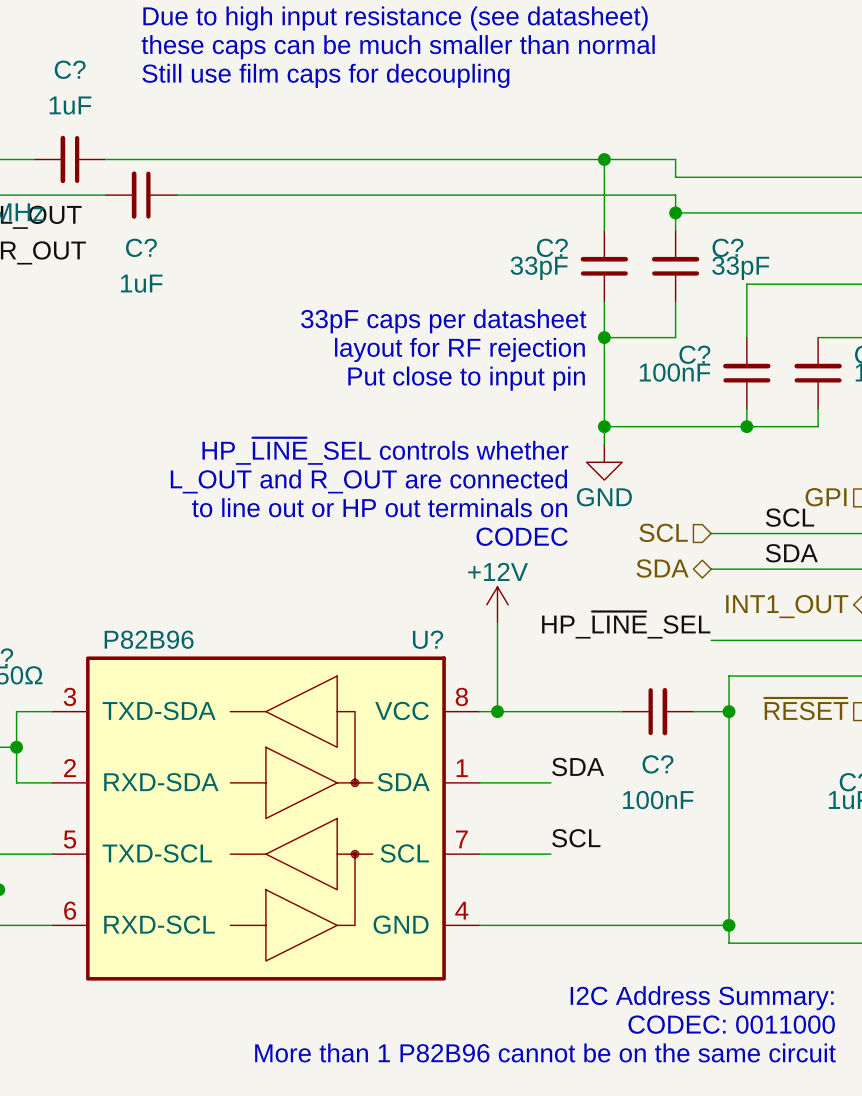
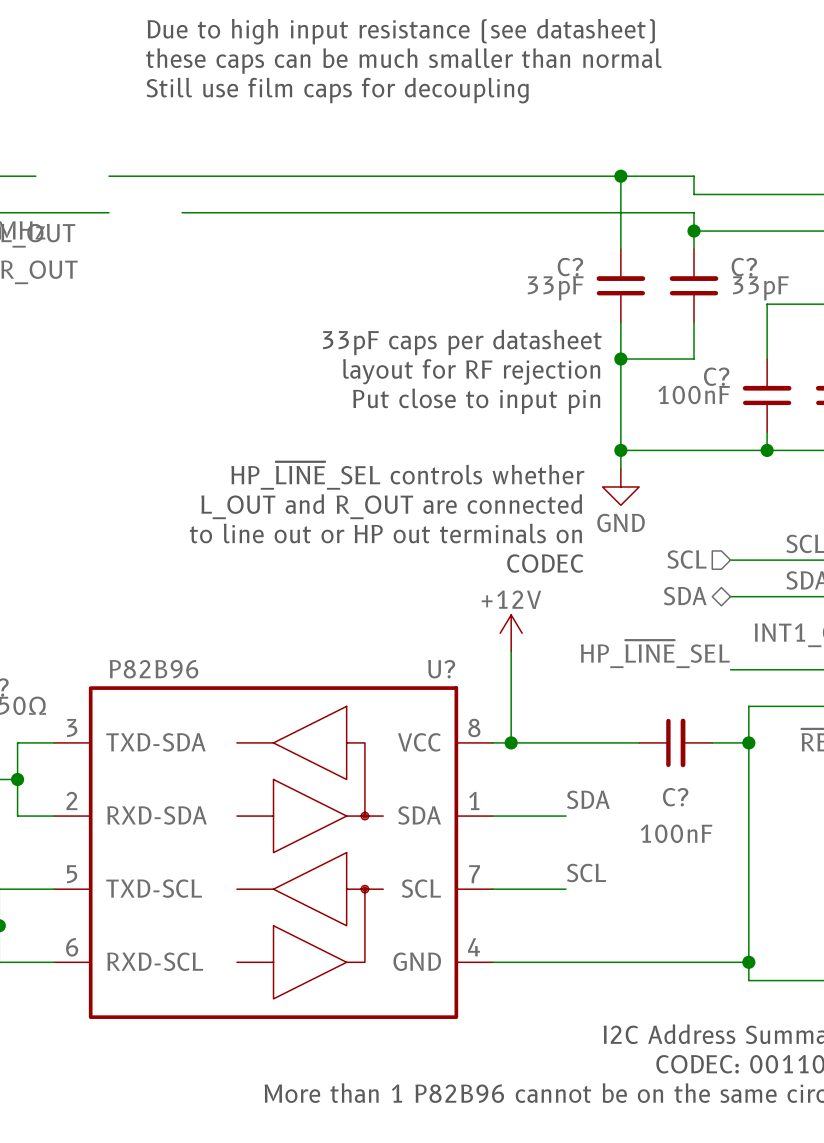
C?: 1uF (70, 159) -> none
C?: 1uF (141, 195) -> none

